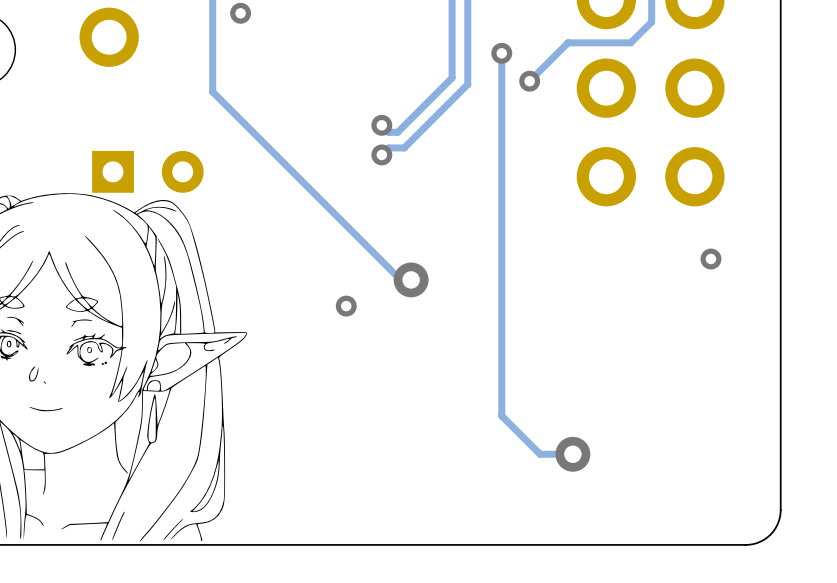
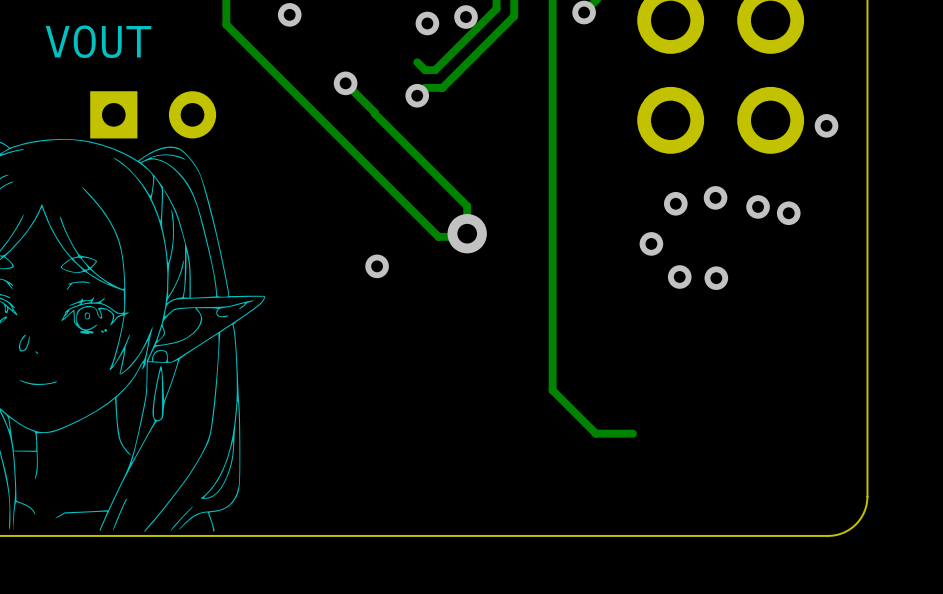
via: none -> (289, 14)
via: none -> (465, 17)
via: none -> (427, 23)
text: none -> VOUT (98, 41)
via: (381, 125) -> none
track: none -> (345, 83) (467, 206) (467, 233)
via: none -> (345, 83)
via: none -> (826, 125)
via: none -> (715, 197)
via: none -> (675, 203)
via: none -> (758, 206)
via position: (411, 279) -> (467, 233)
via: none -> (651, 243)
via: none -> (679, 276)
via: none -> (716, 278)
via: (572, 454) -> none

